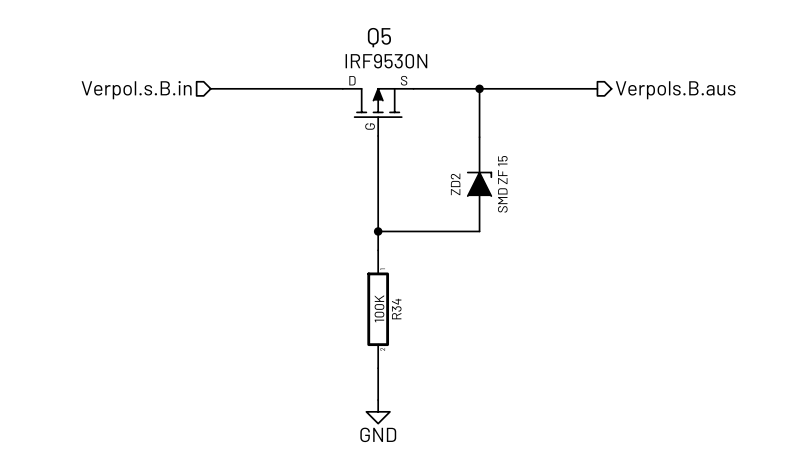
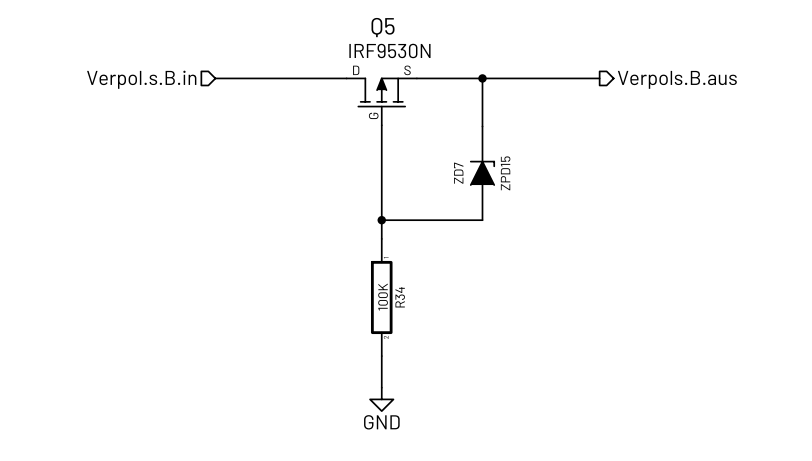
ZD2 name: ZD2 (455, 184) -> ZD7 (458, 173)
ZD2 value: SMD ZF 15 (502, 184) -> ZPD15 (505, 173)

